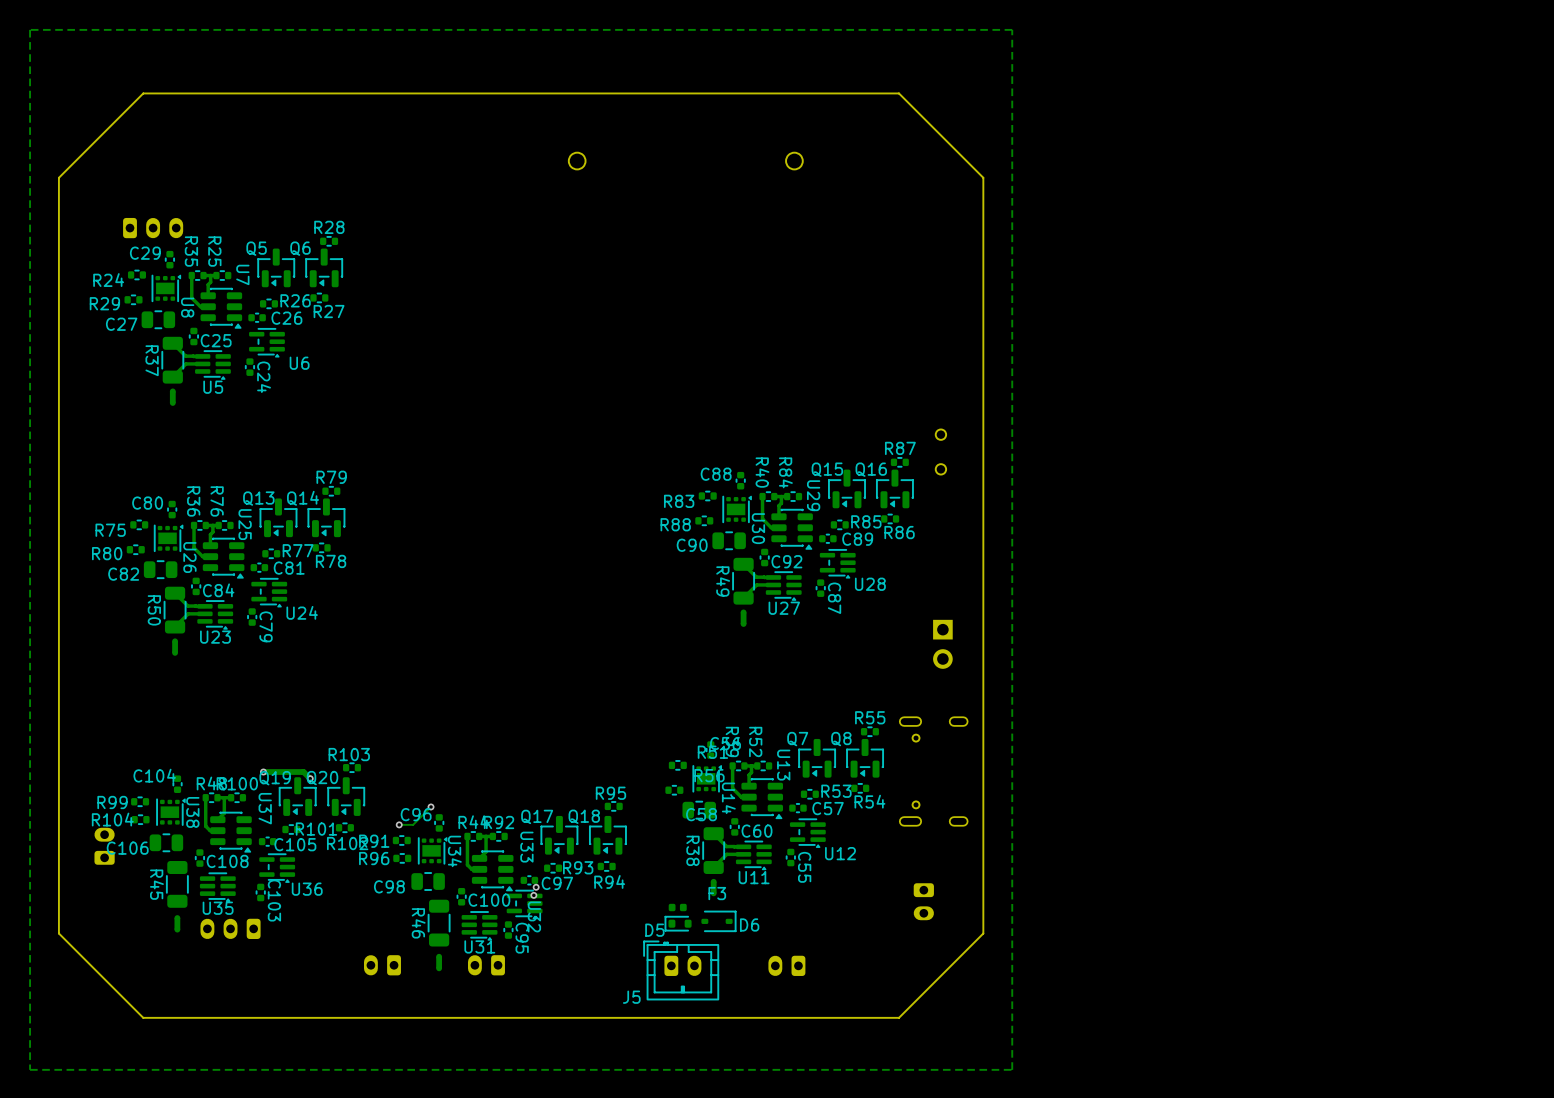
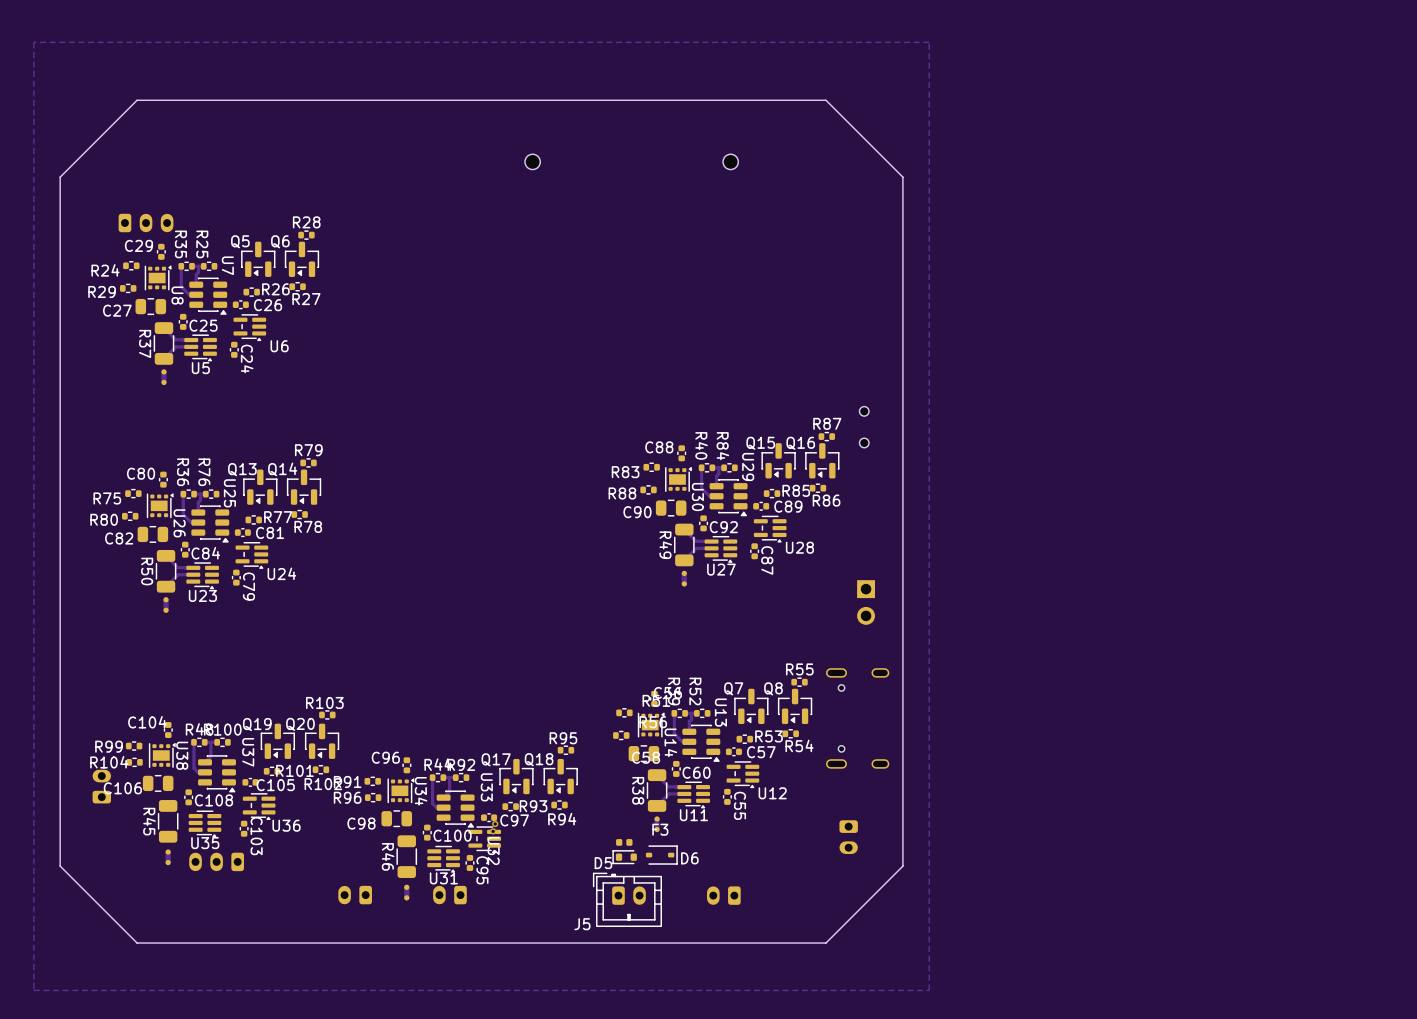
track: (263, 772) (303, 772) (310, 778) -> none
via: (263, 772) -> none
via: (310, 778) -> none
track: (431, 806) (413, 824) (399, 824) -> none
via: (431, 806) -> none
via: (399, 824) -> none

